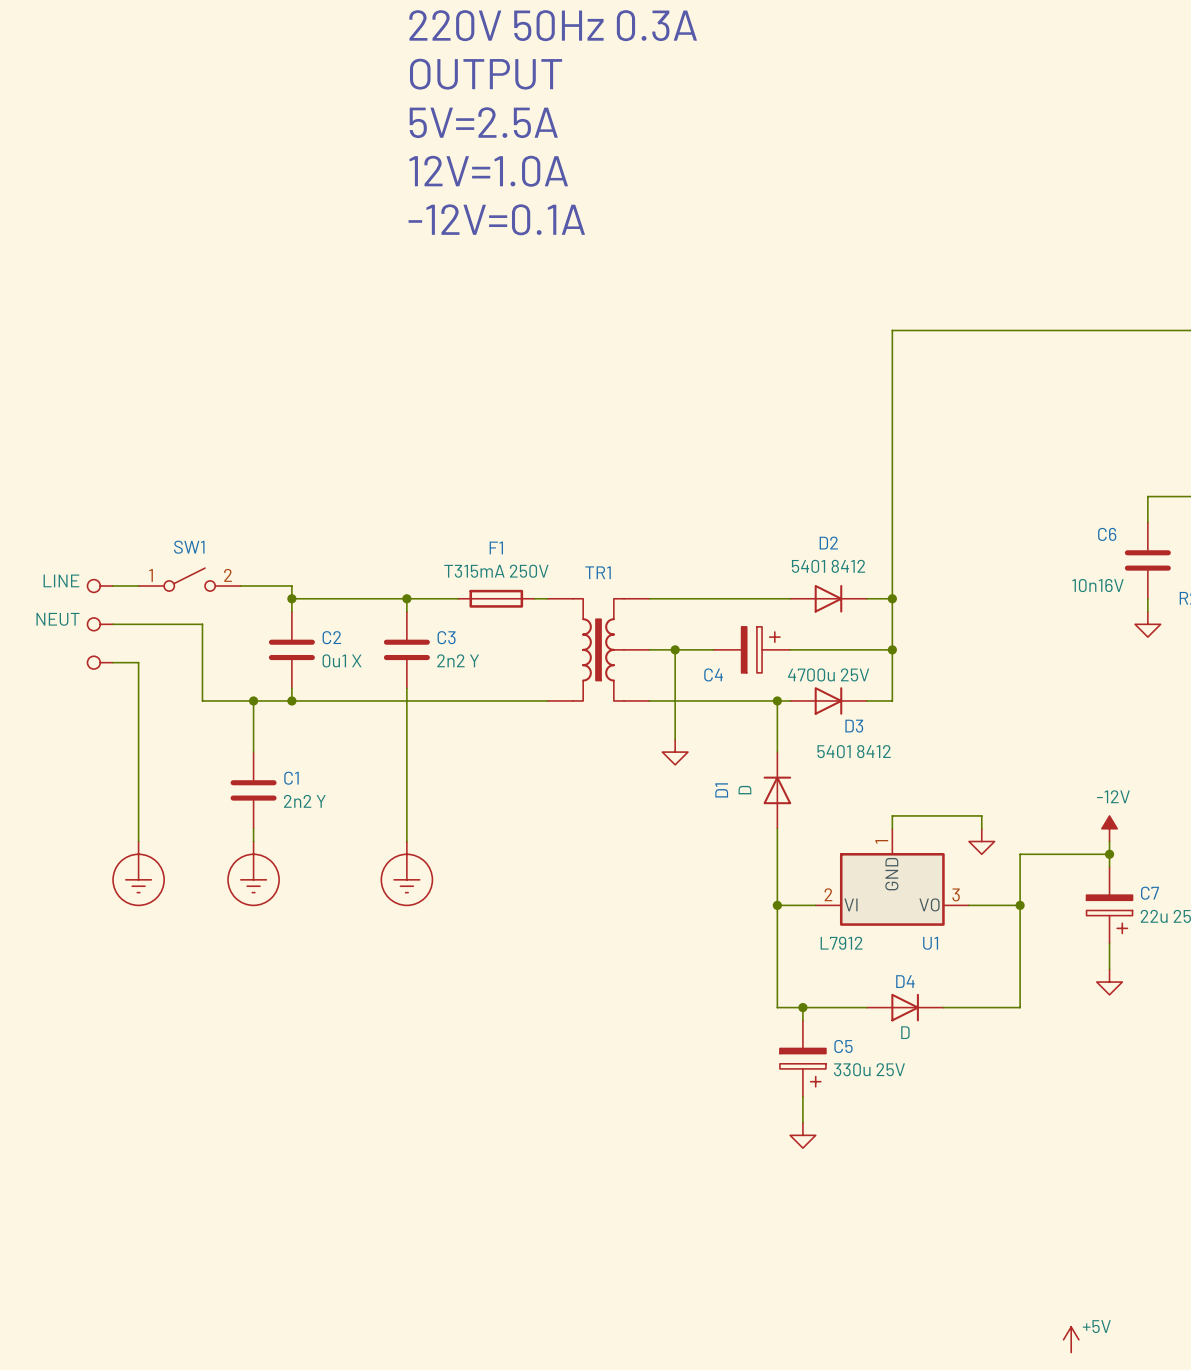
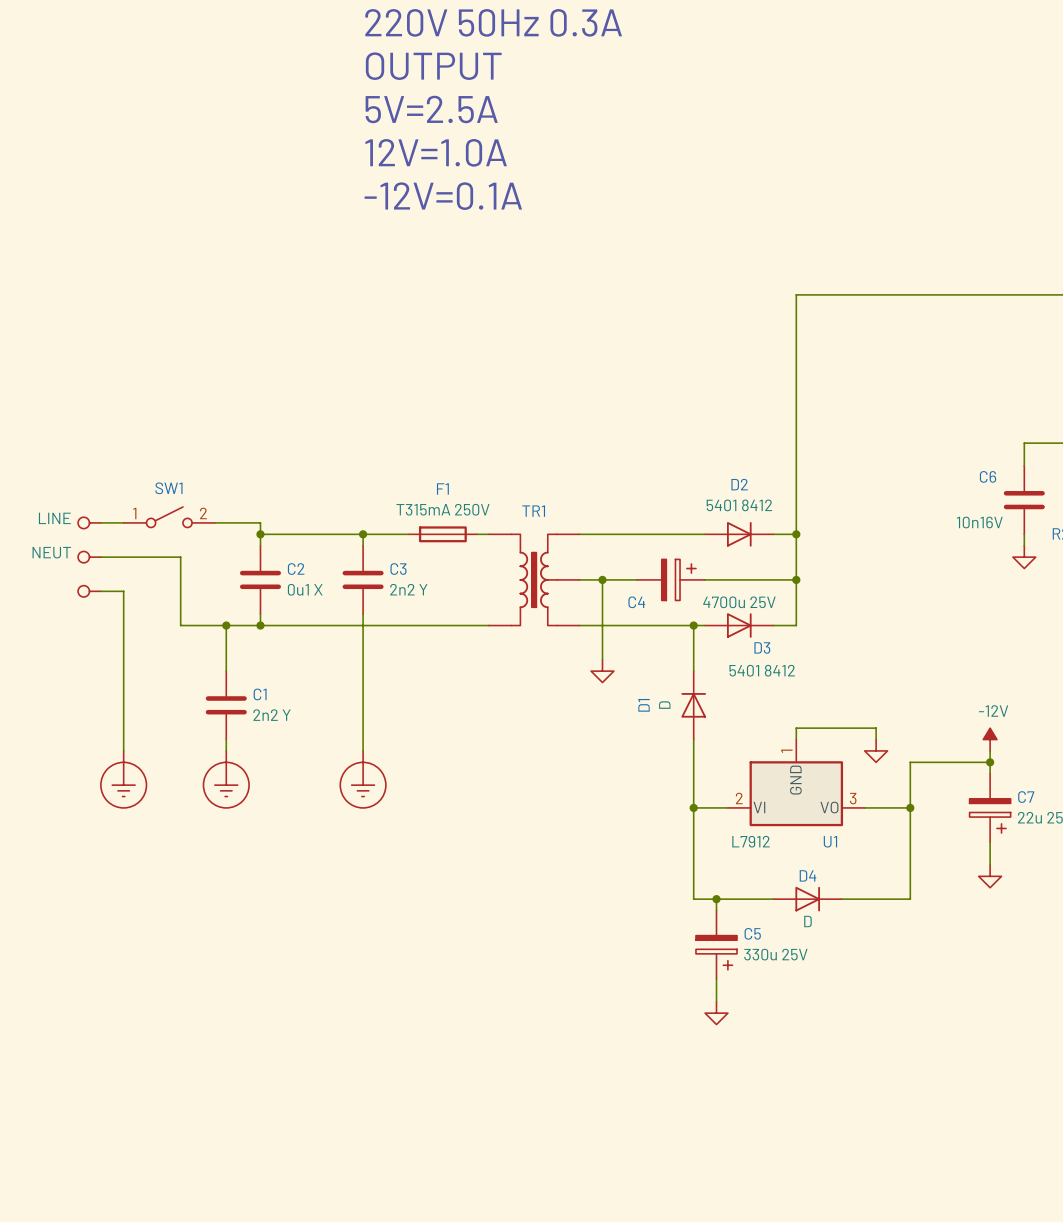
power symbol: +5V (1071, 1339) -> none

